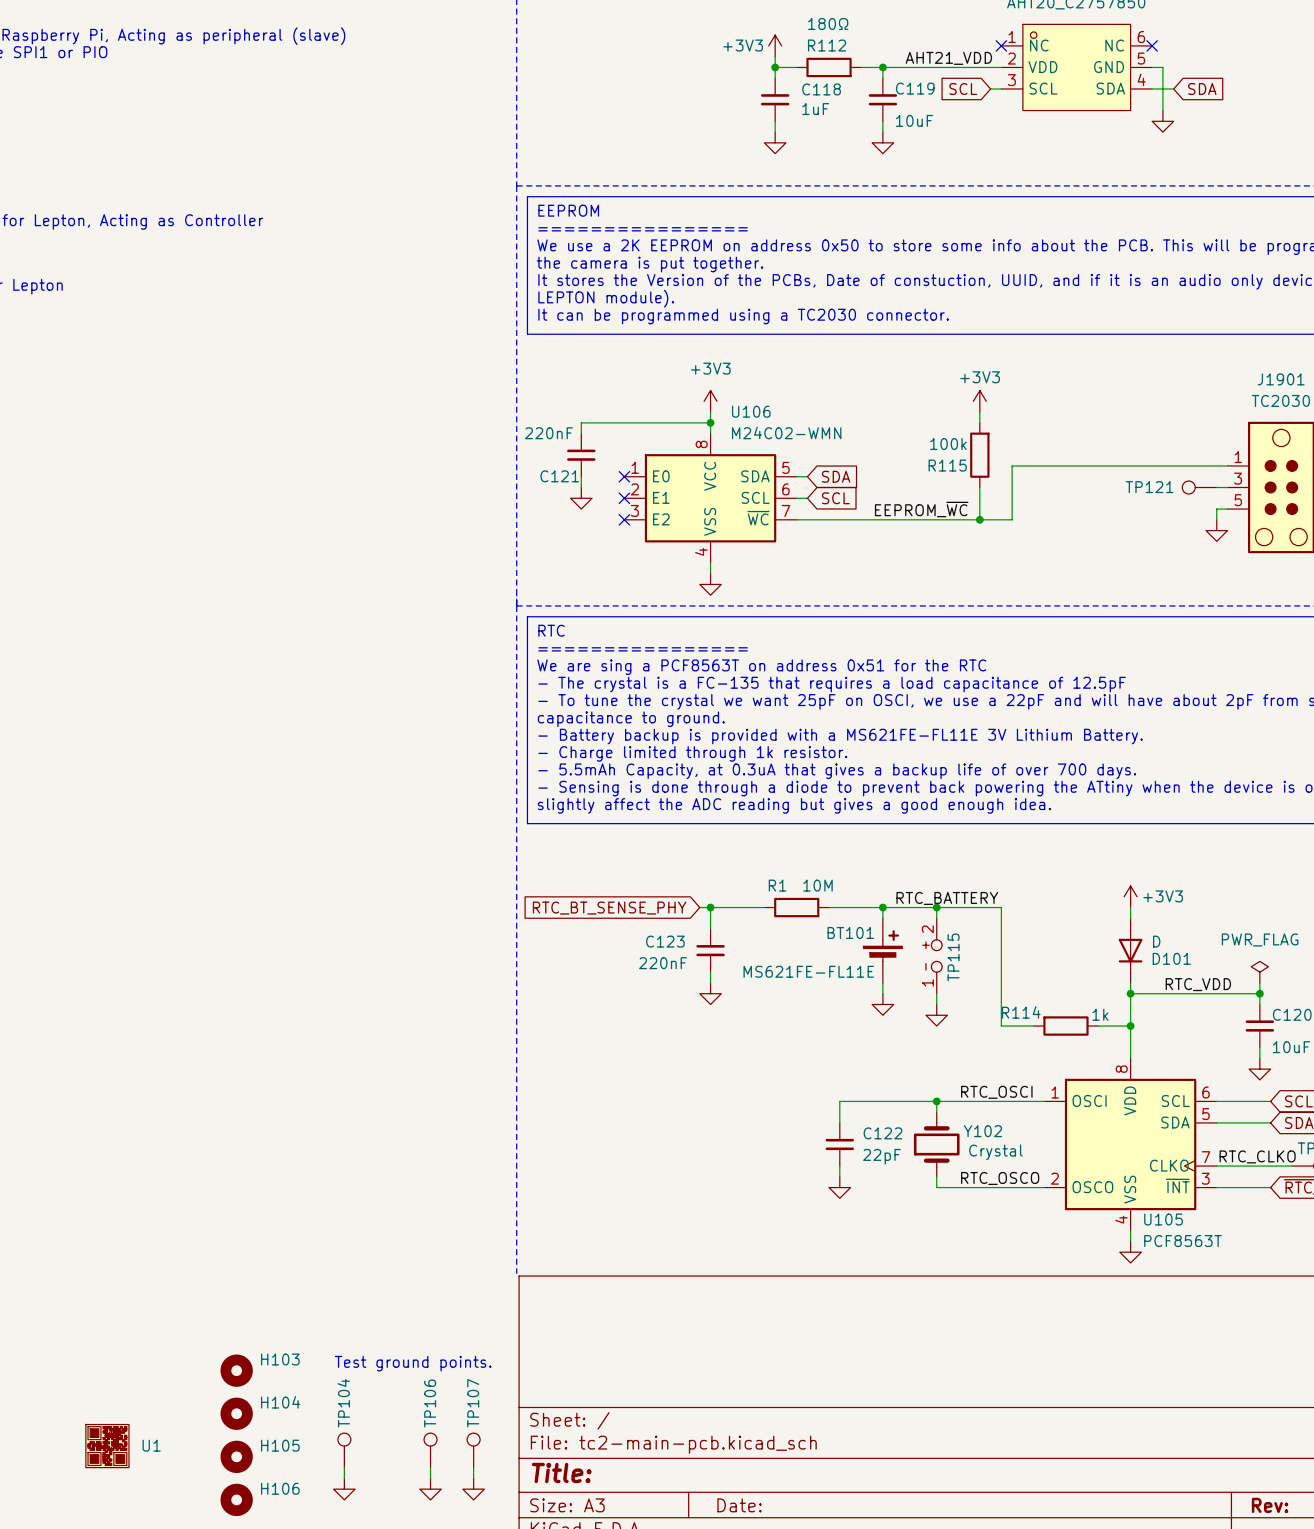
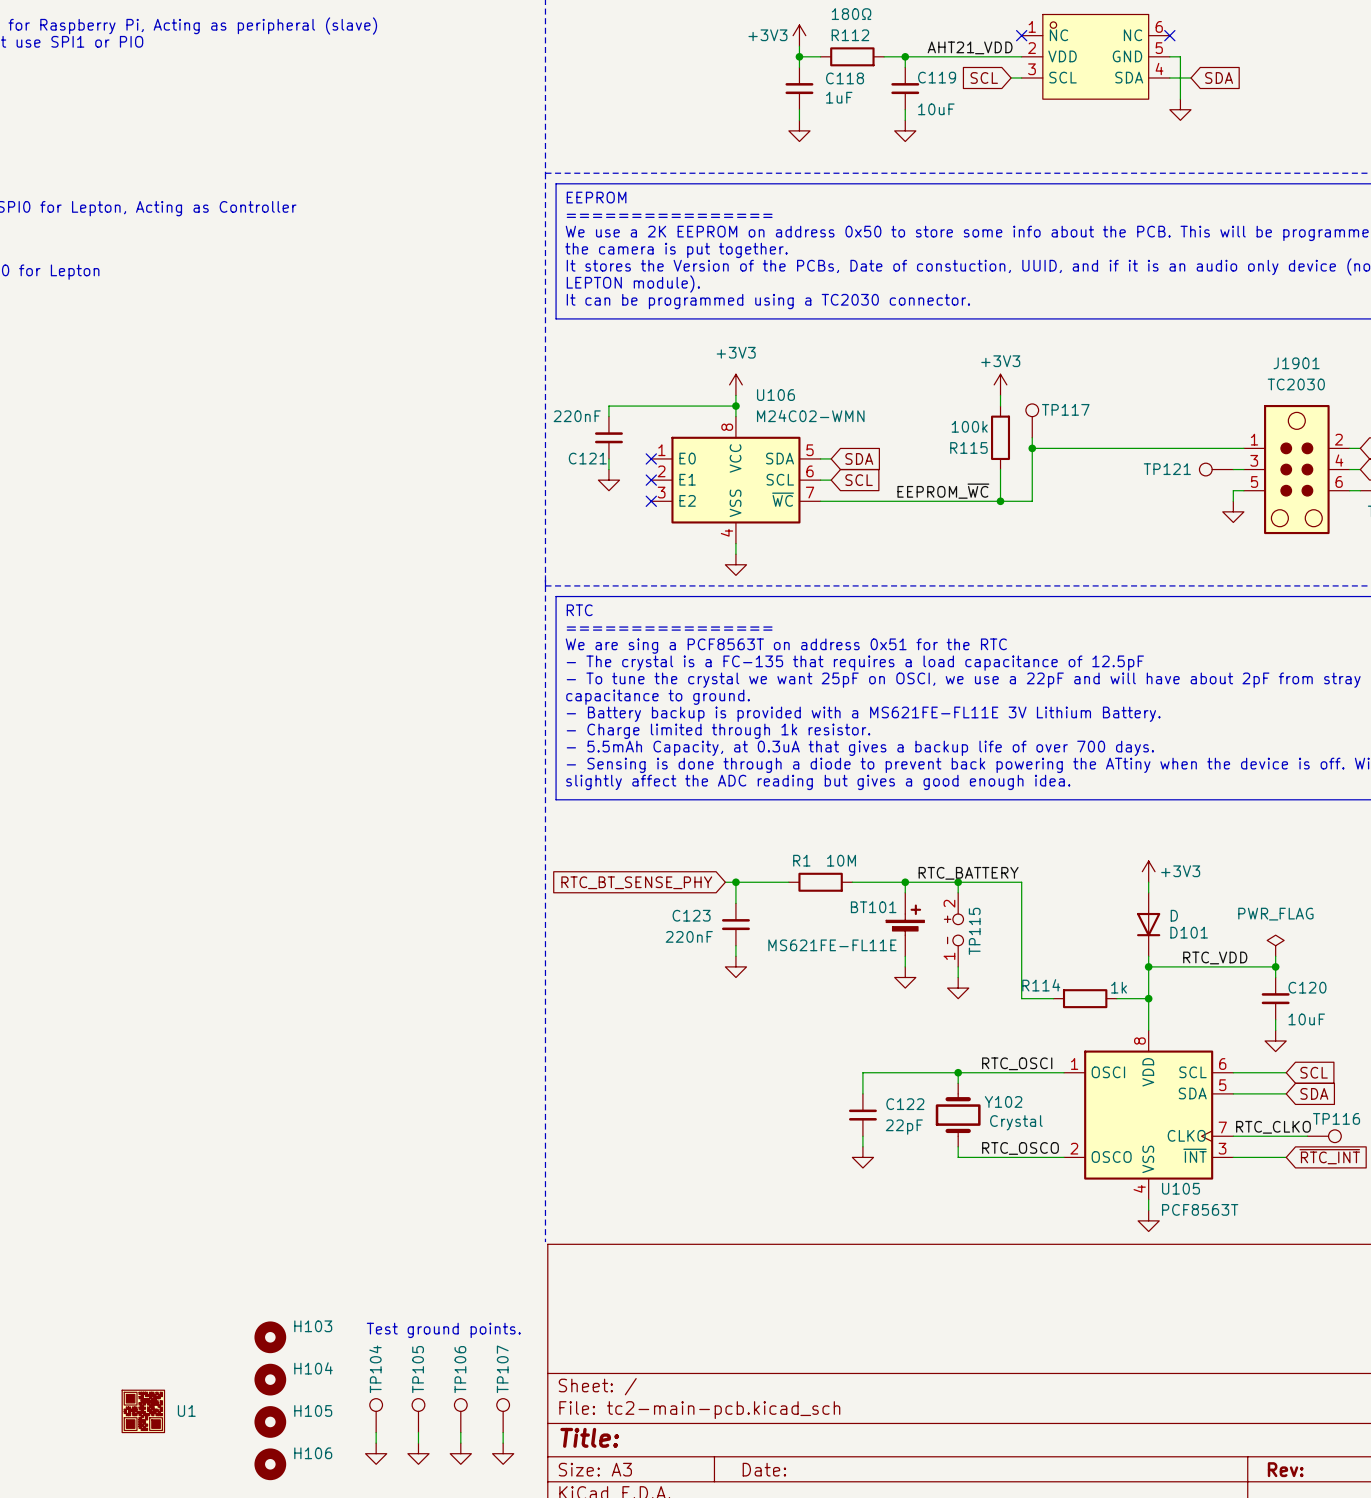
TP117: none -> (1032, 420)
wire: none -> (1032, 437) (1032, 448)
junction: none -> (1032, 448)
TP105: none -> (418, 1415)
wire: none -> (418, 1432) (418, 1443)
power symbol: none -> (418, 1453)

